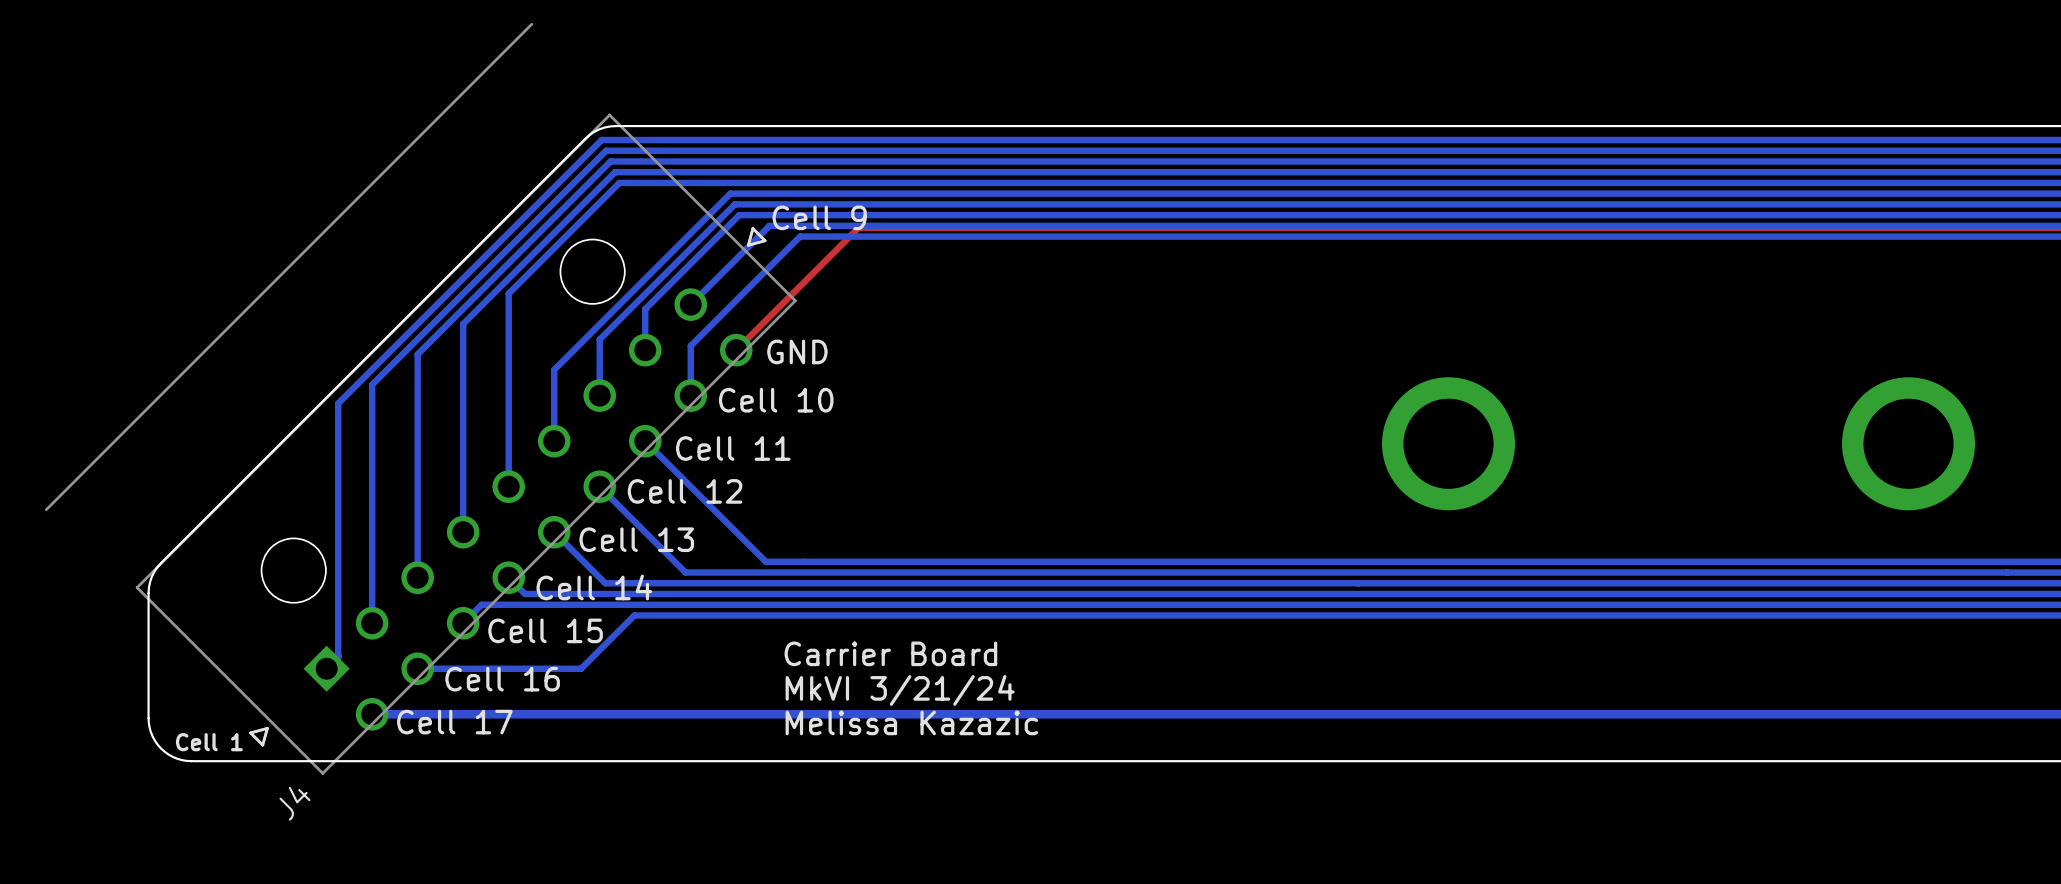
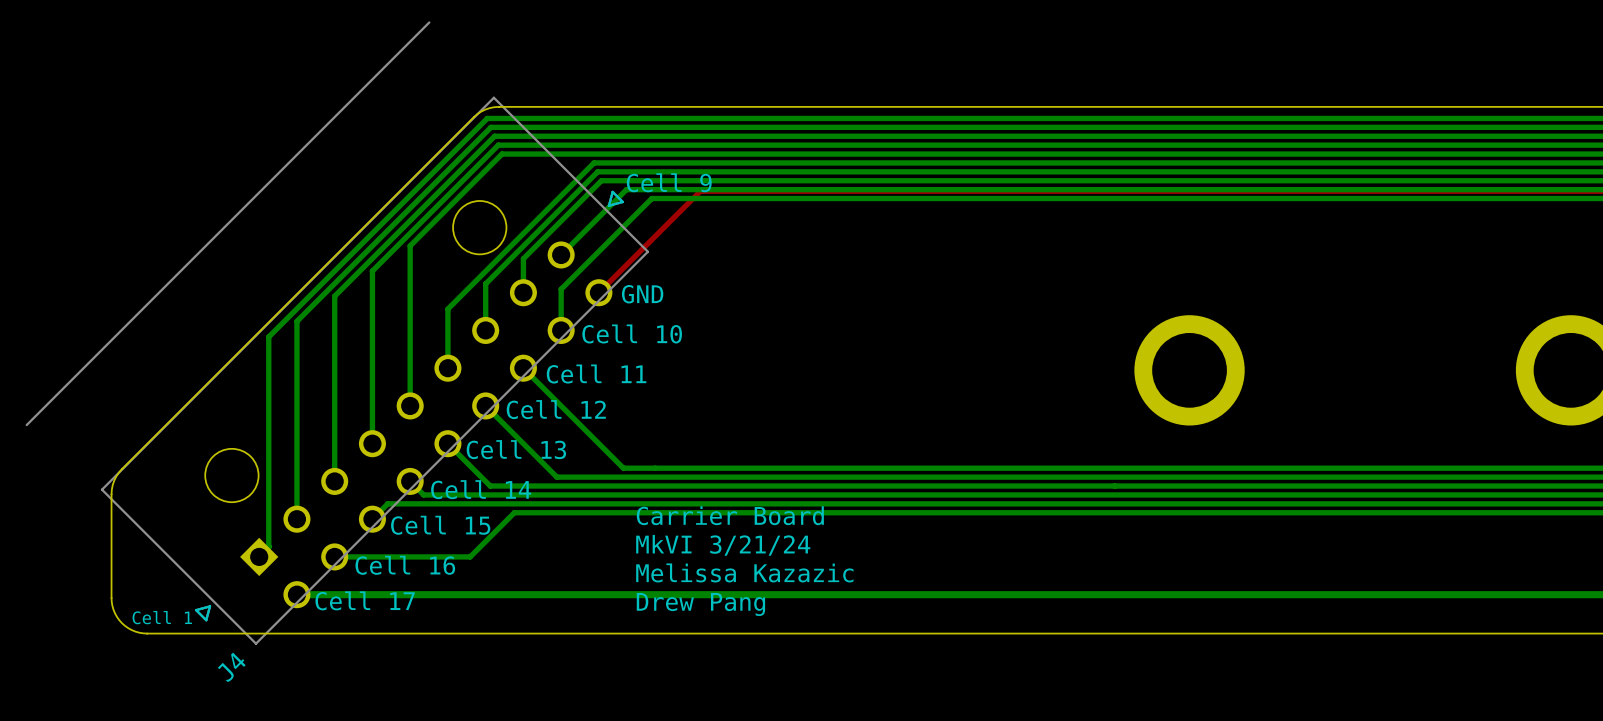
text: none -> Carrier Board (730, 515)
text: Carrier Board (890, 653) -> MkVI 3/21/24 (723, 545)
text: MkVI 3/21/24 (900, 690) -> Melissa Kazazic (744, 572)
text: Melissa Kazazic (911, 722) -> Drew Pang (700, 604)

